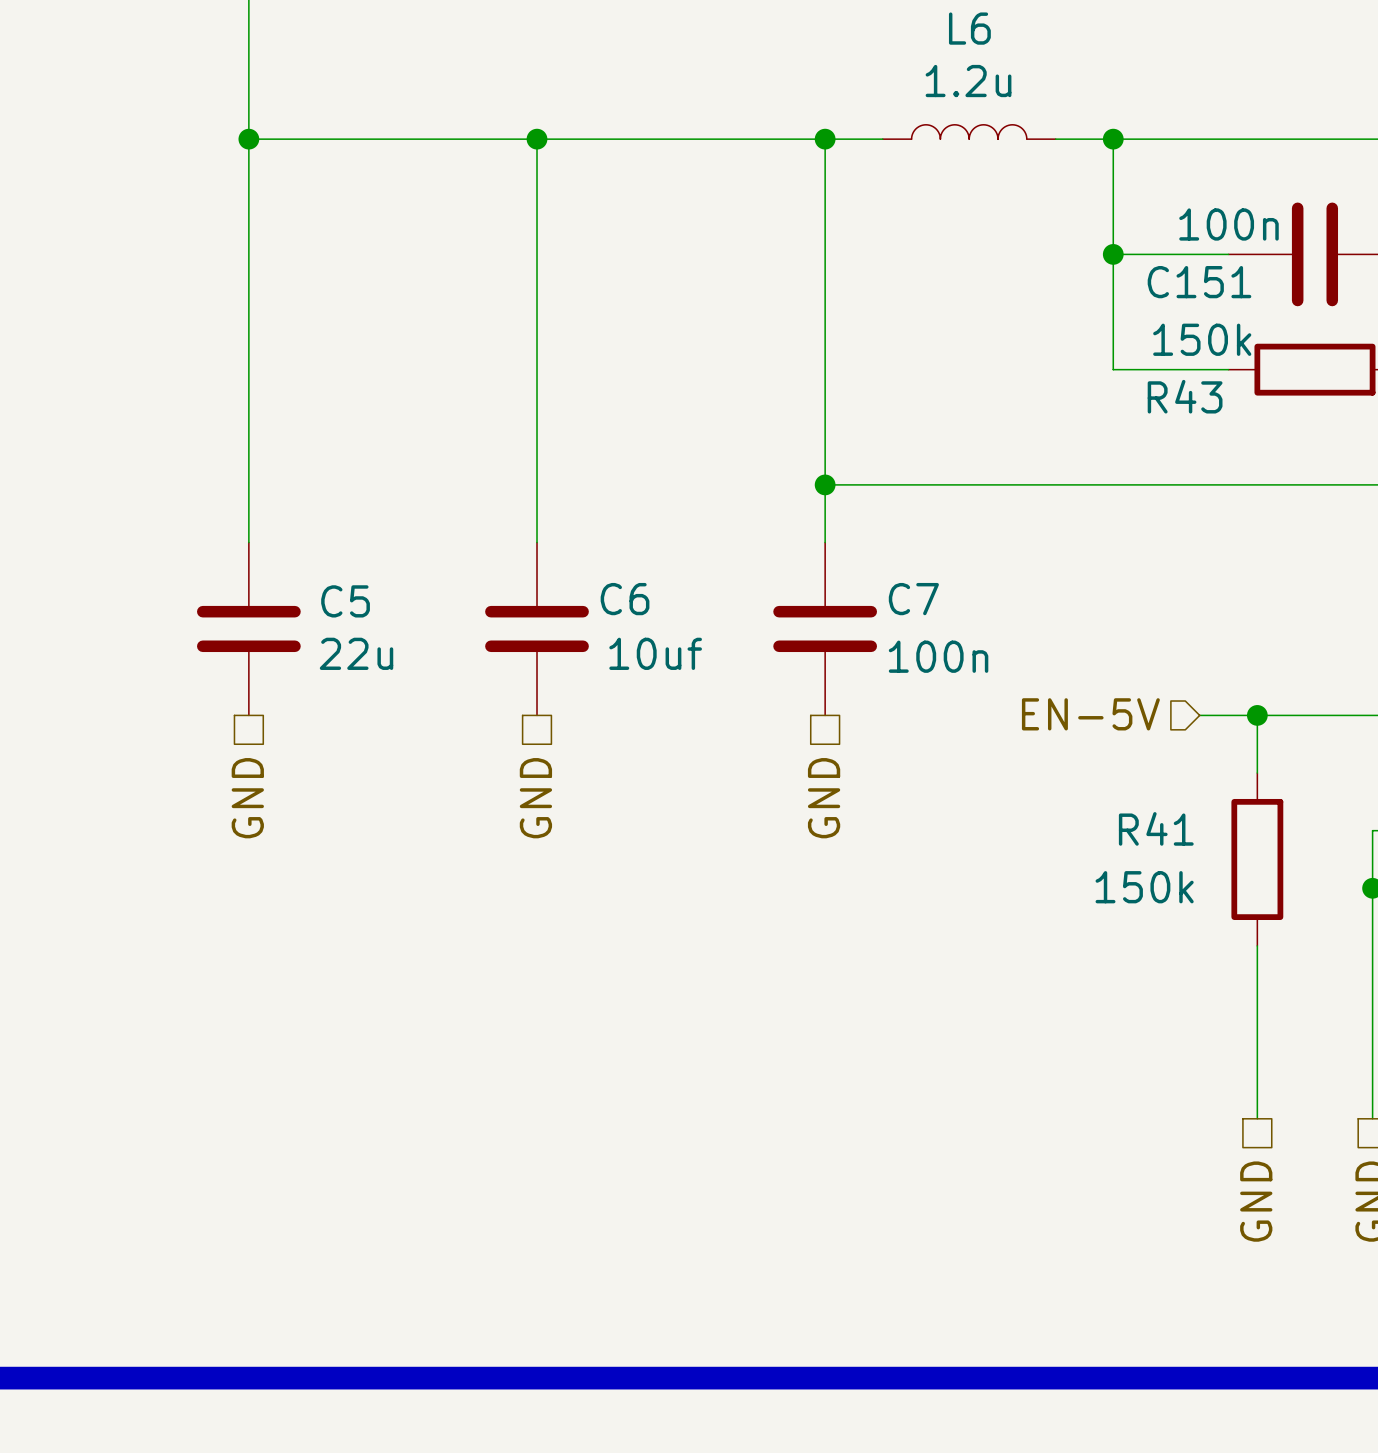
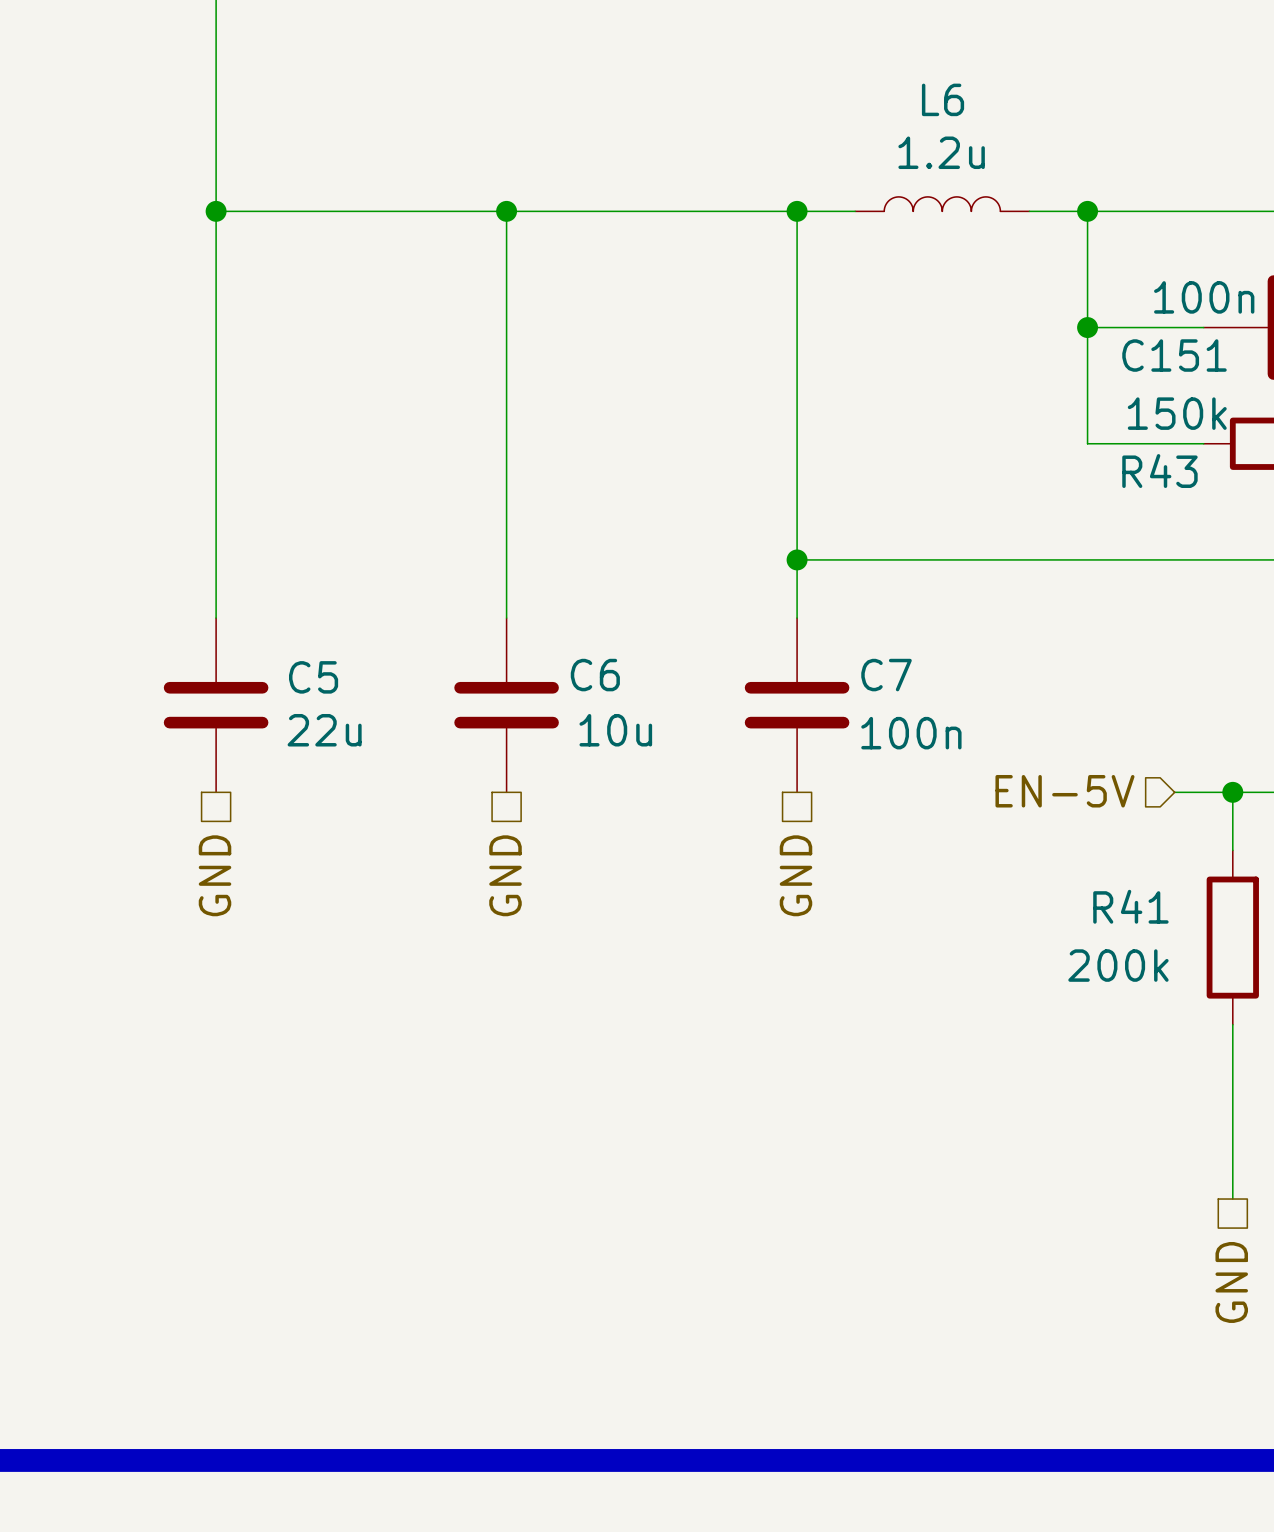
C6 value: 10uf (655, 653) -> 10u (615, 730)
R41 value: 150k (1144, 887) -> 200k (1118, 965)

